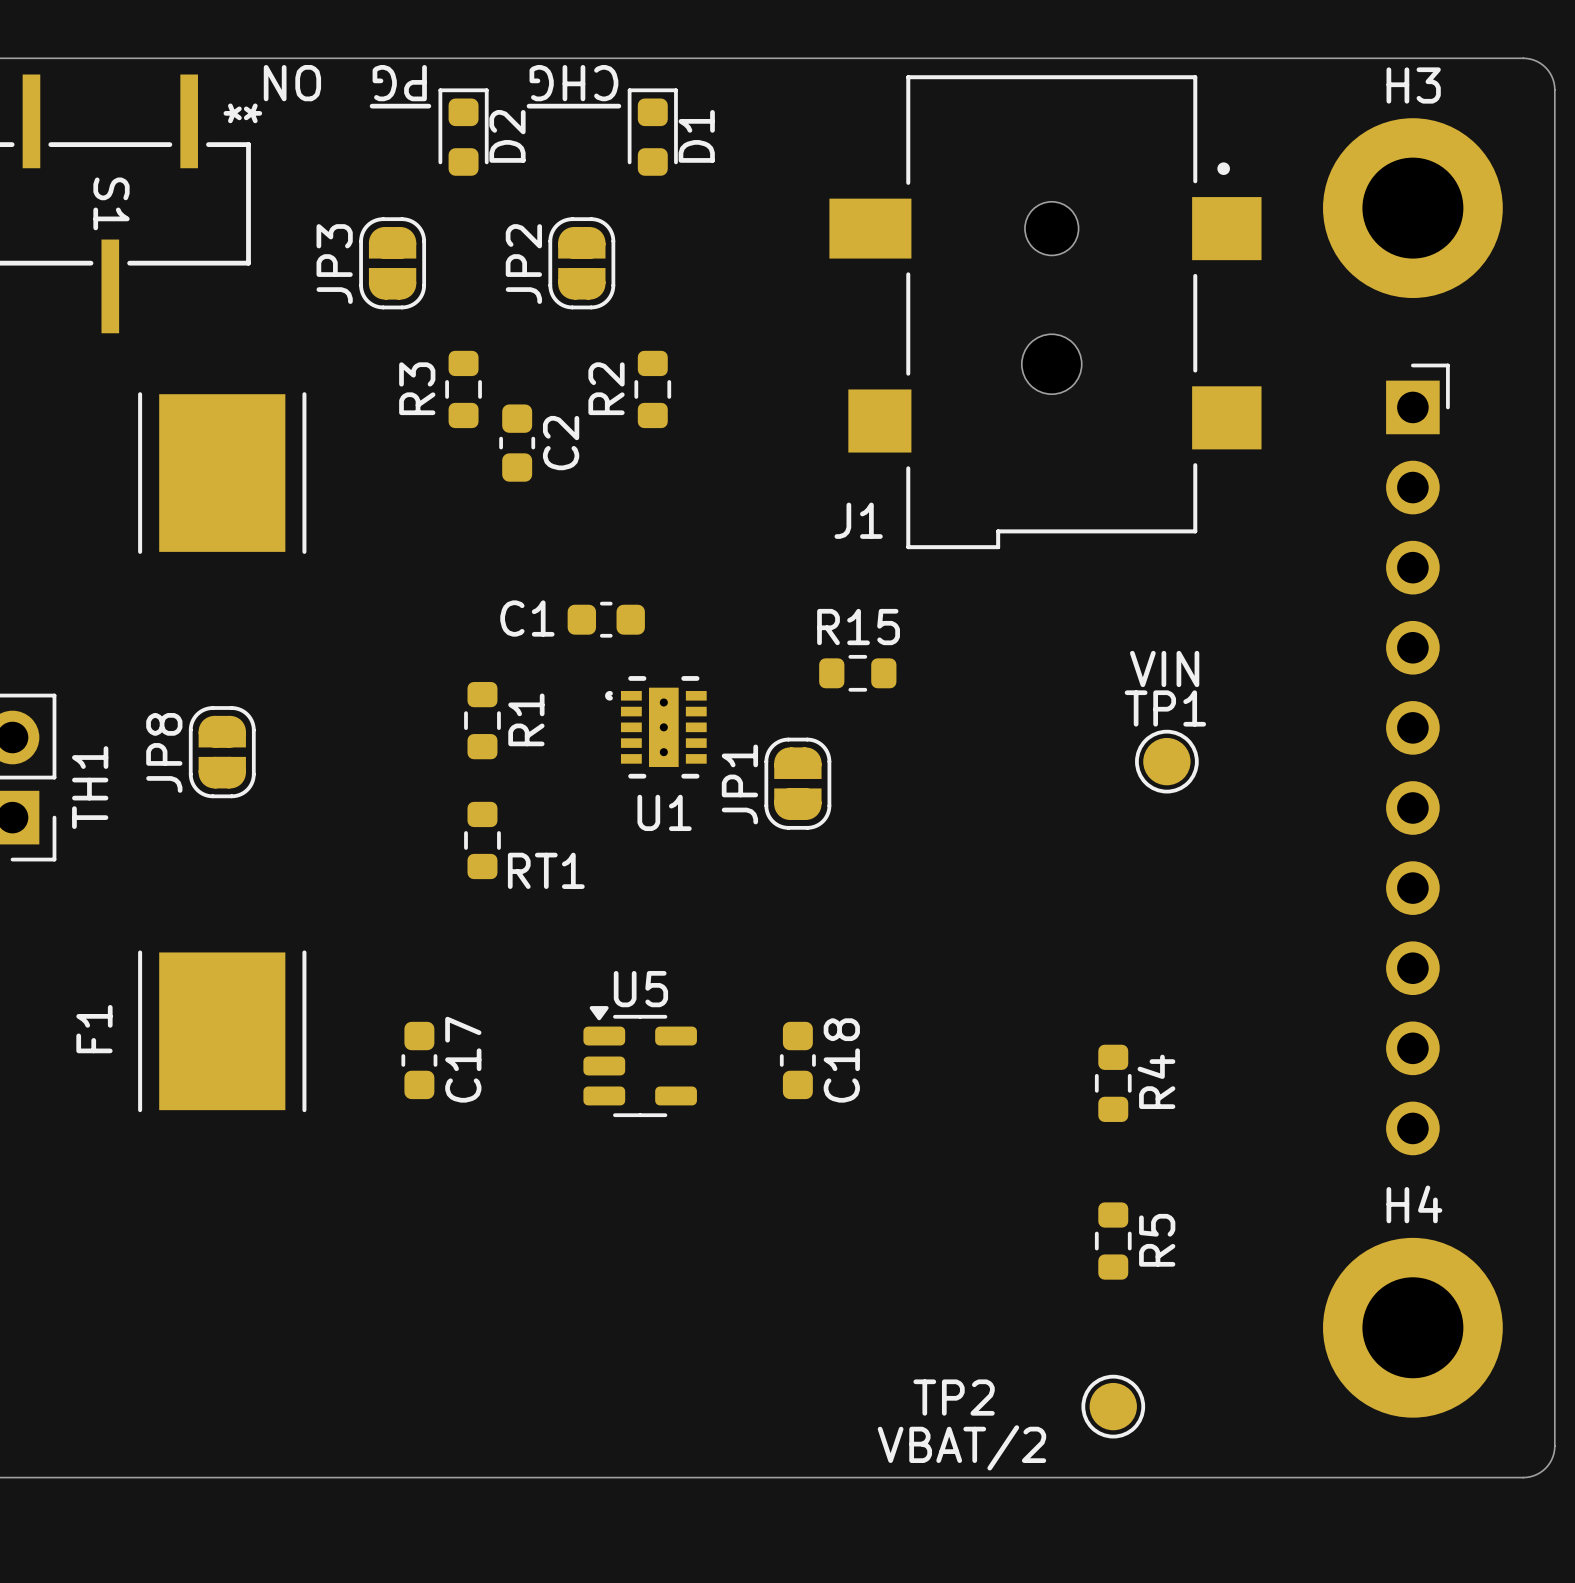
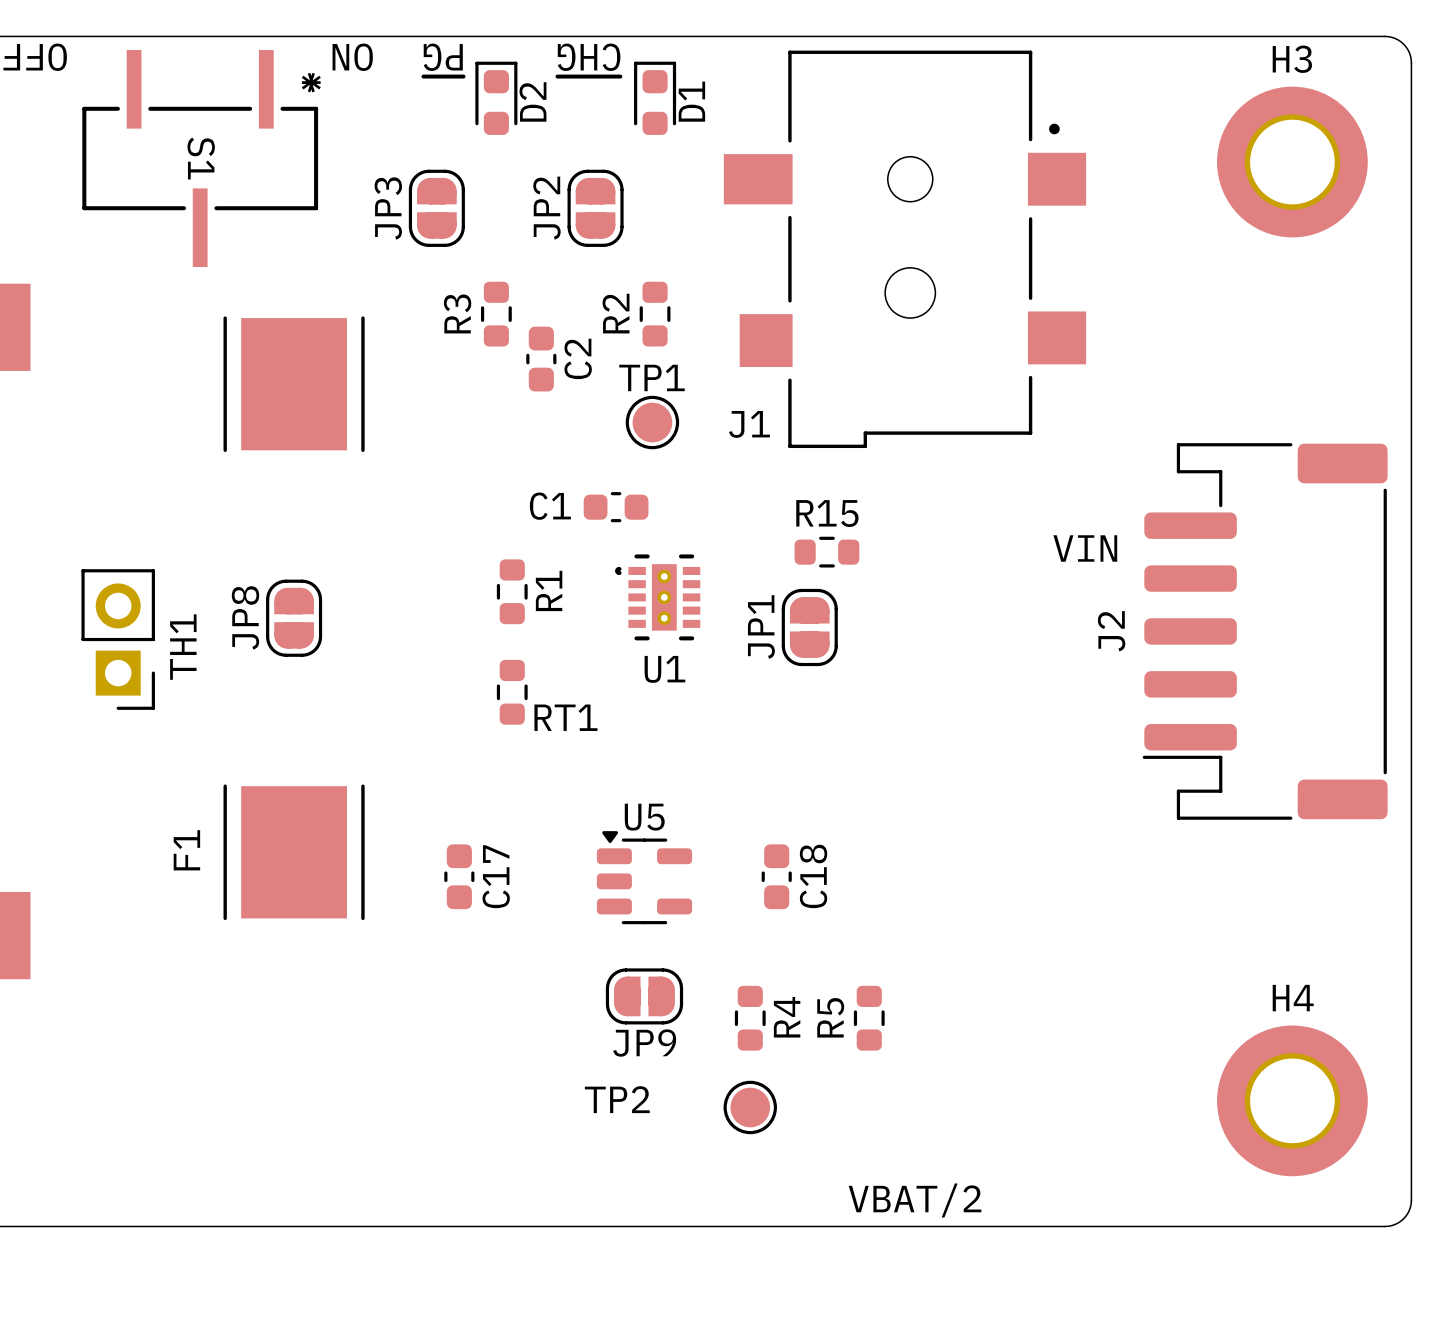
J1 position: (1045, 312) -> (904, 249)
part: (1417, 759) -> none
TP1 position: (1166, 761) -> (652, 422)
J2: none -> (1265, 631)
JP1 position: (797, 783) -> (809, 627)
R4 position: (1113, 1083) -> (750, 1018)
JP9: none -> (644, 996)
R5 name position: R5 (1157, 1240) -> R5 (830, 1017)
R5 position: (1113, 1241) -> (869, 1018)
TP2 position: (1113, 1406) -> (750, 1107)

